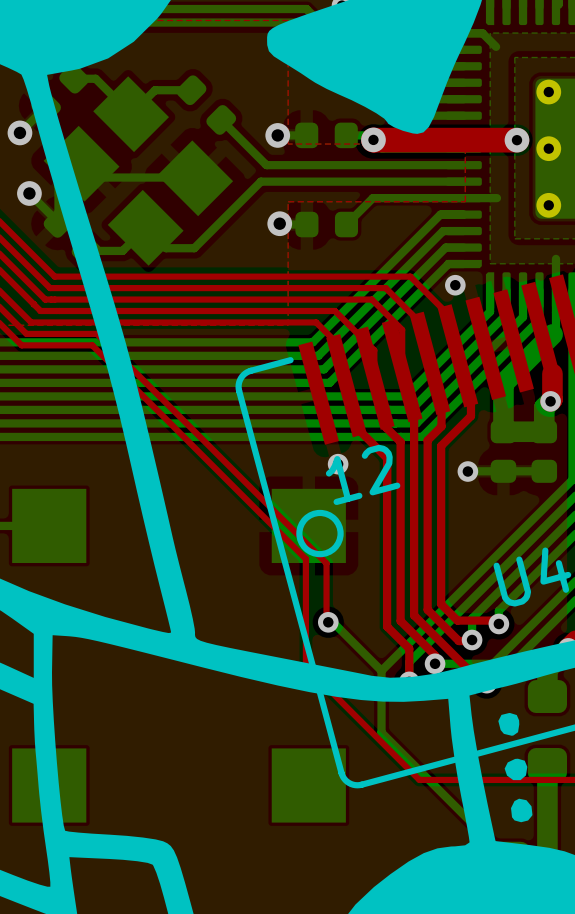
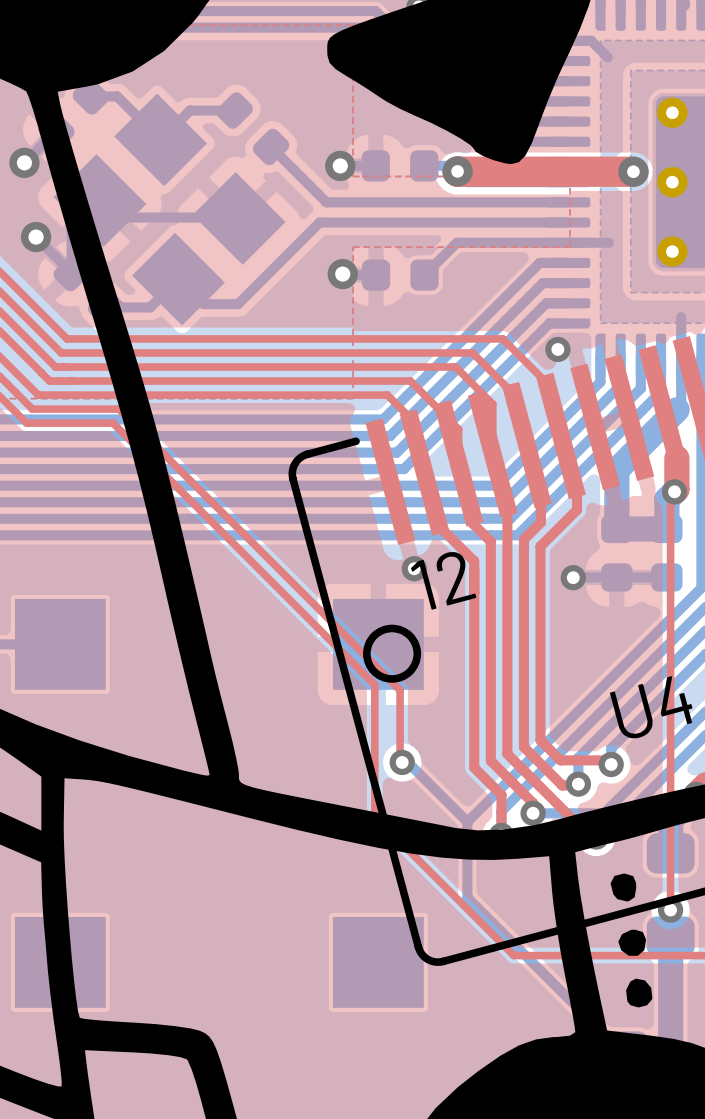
top track: none -> (674, 491) (670, 495) (670, 910)
via: none -> (670, 910)

